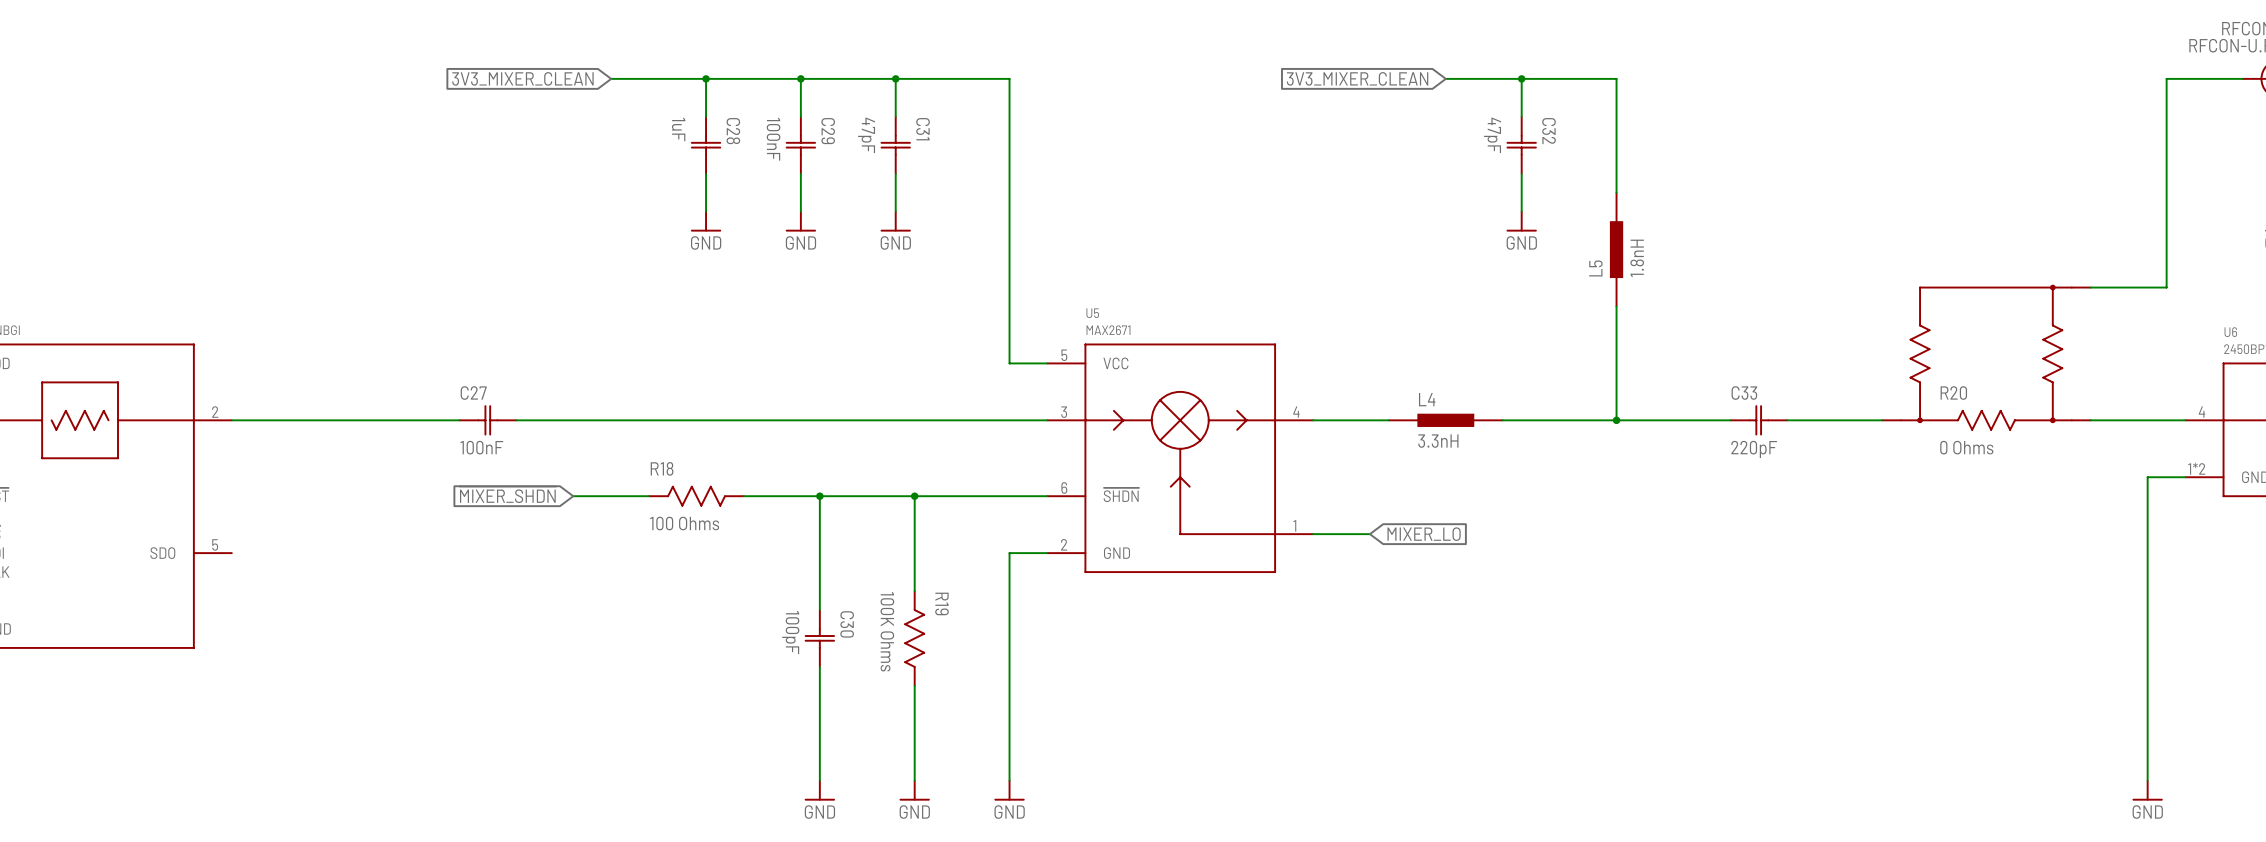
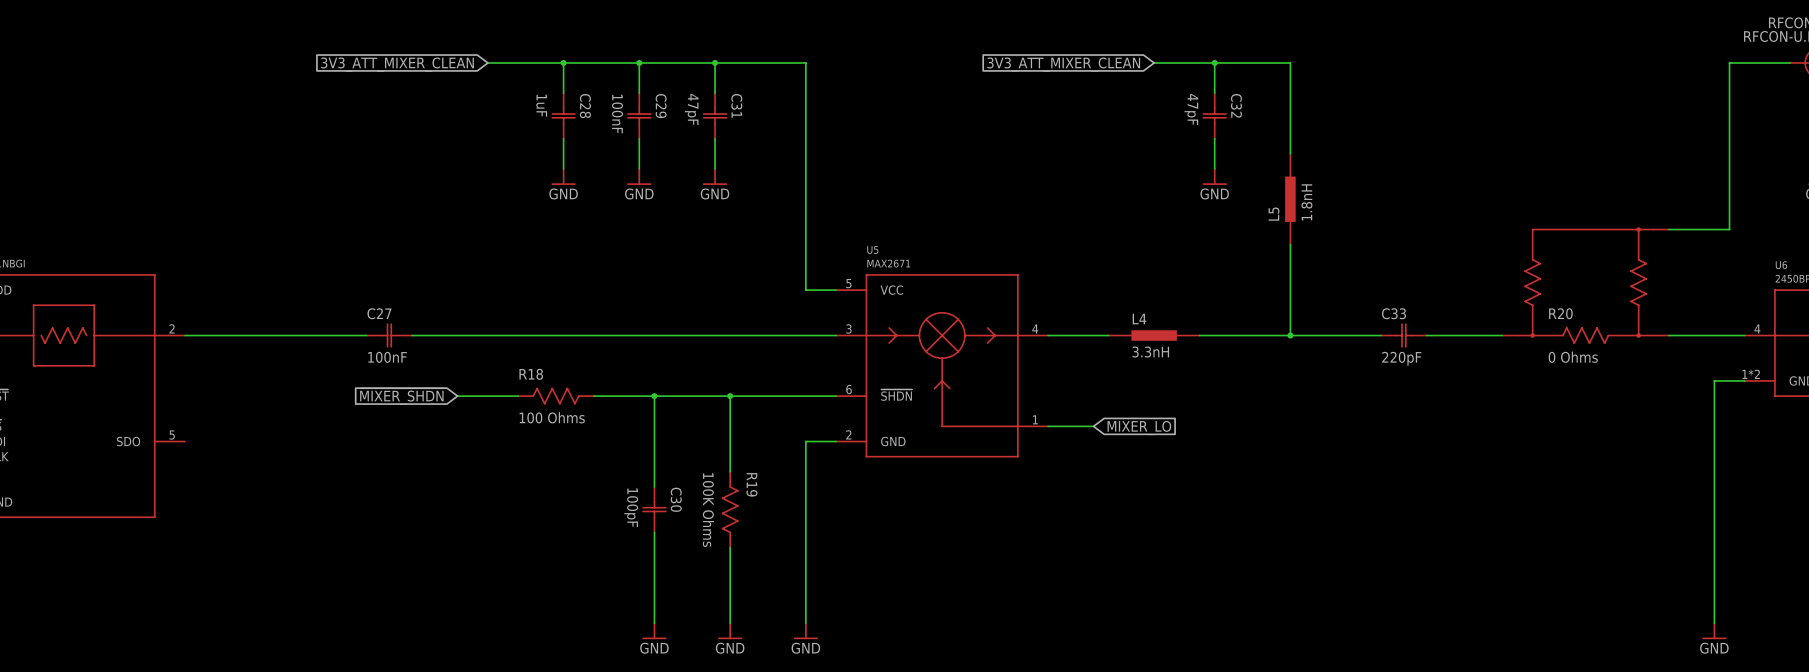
global label: 3V3_MIXER_CLEAN (522, 78) -> 3V3_ATT_MIXER_CLEAN (397, 64)
global label: 3V3_MIXER_CLEAN (1357, 78) -> 3V3_ATT_MIXER_CLEAN (1063, 64)

